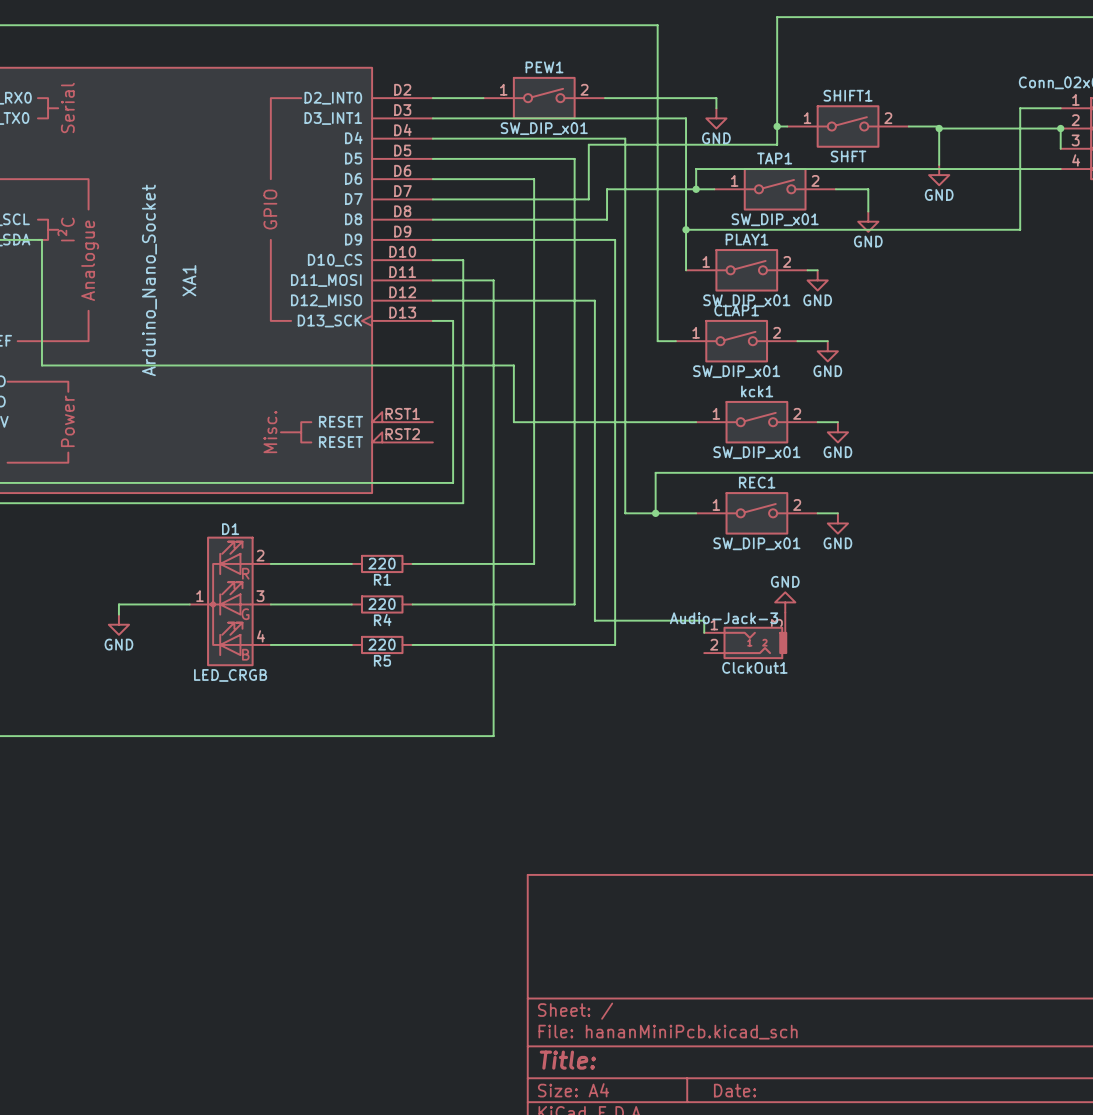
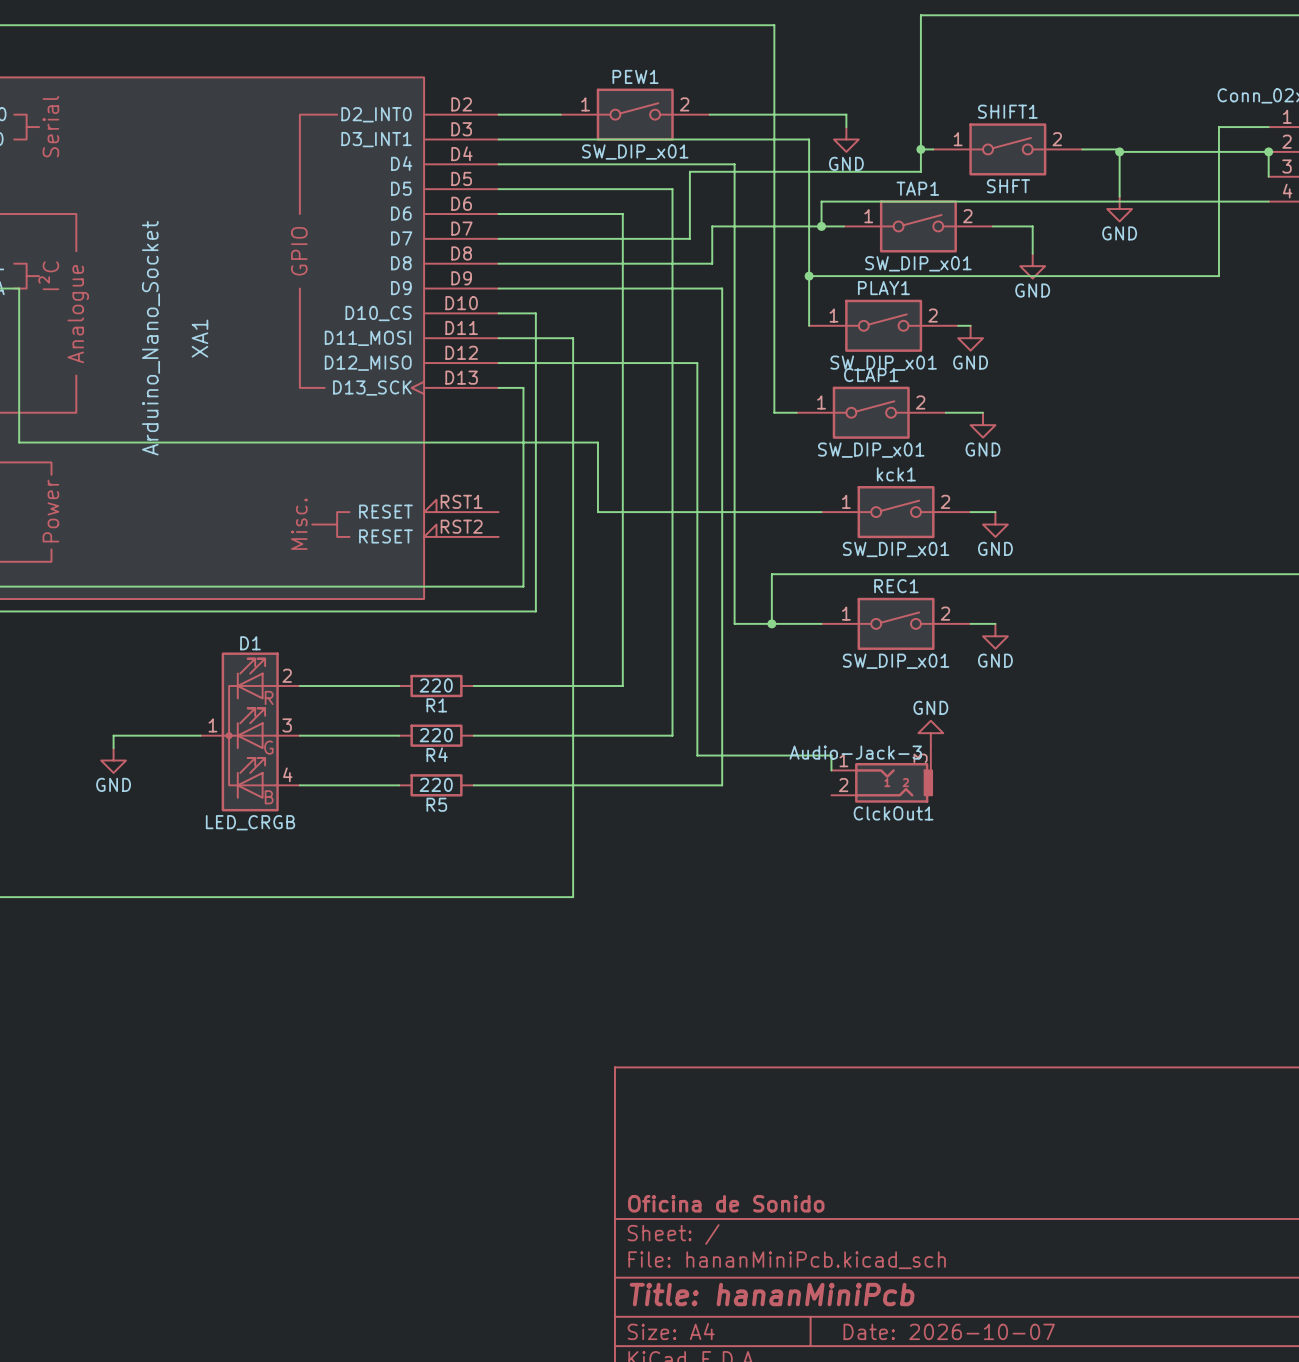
title block: none -> Oficina de Sonido (726, 1203)
title block: Title: (567, 1060) -> Title: hananMiniPcb (772, 1294)
title block: Date: (735, 1090) -> Date: 2026-10-07 (949, 1331)

